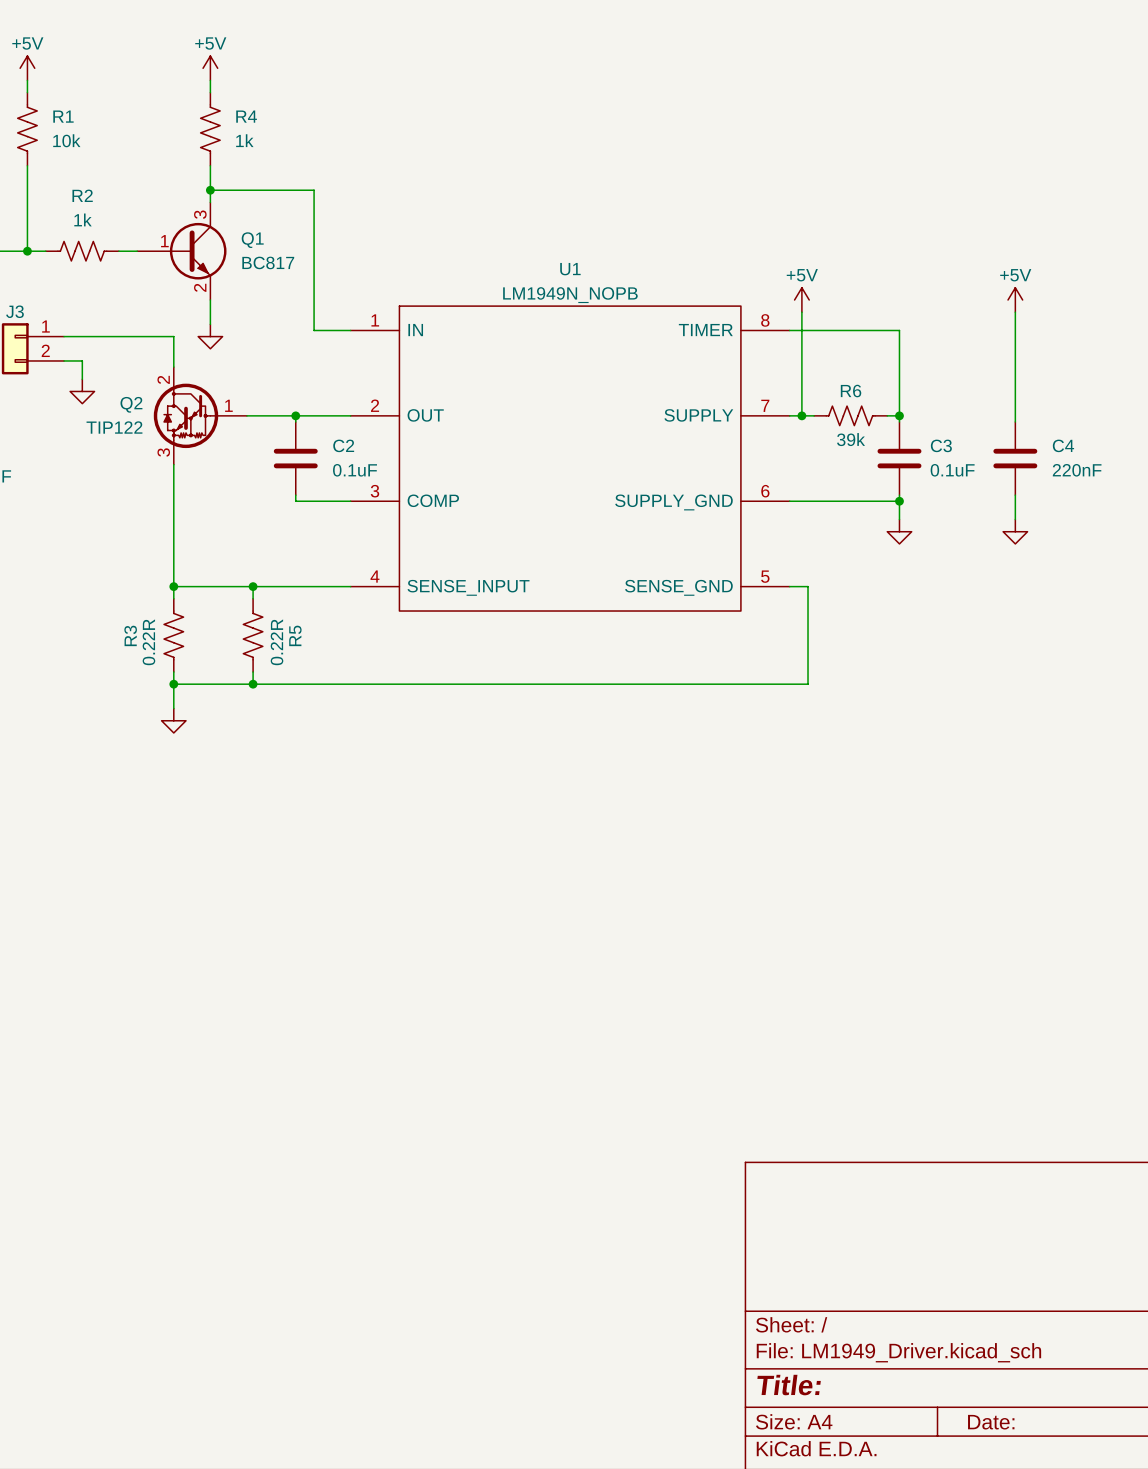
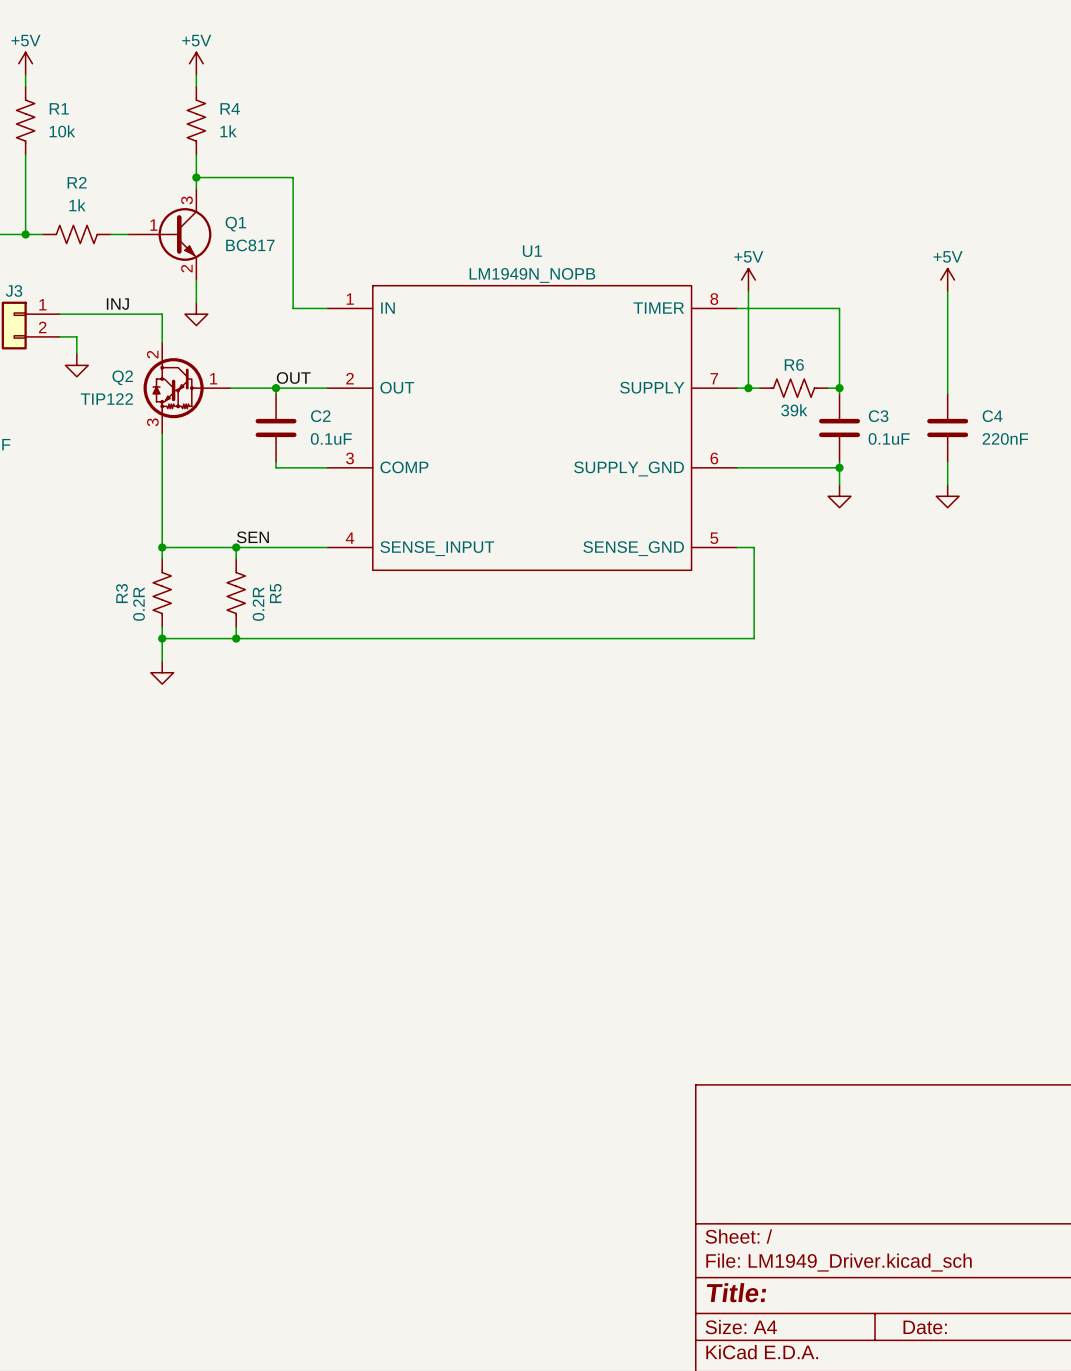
label: none -> INJ (117, 304)
label: none -> OUT (293, 377)
label: none -> SEN (252, 537)
R3 value: 0.22R (148, 642) -> 0.2R (139, 604)
R5 value: 0.22R (277, 642) -> 0.2R (258, 604)

